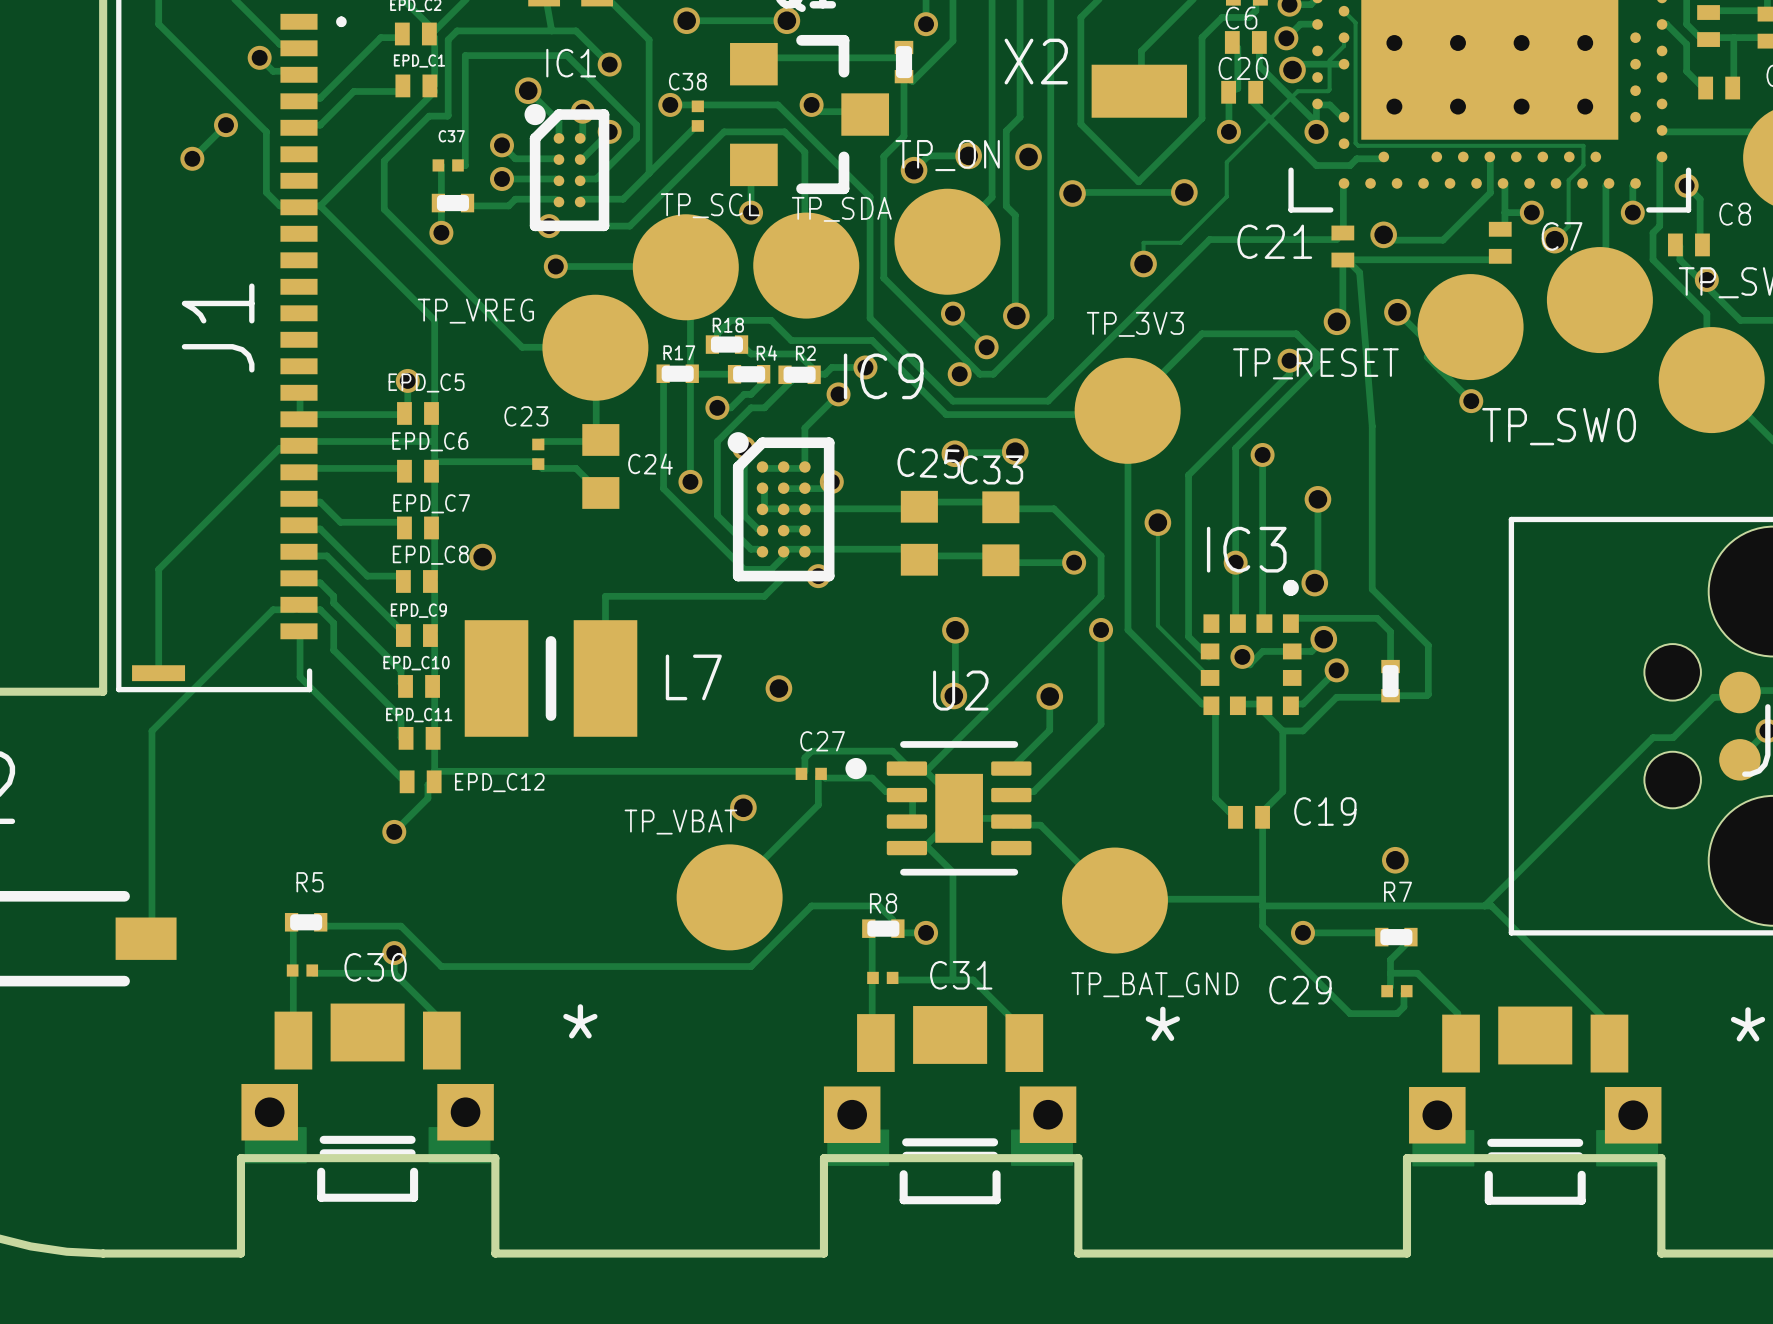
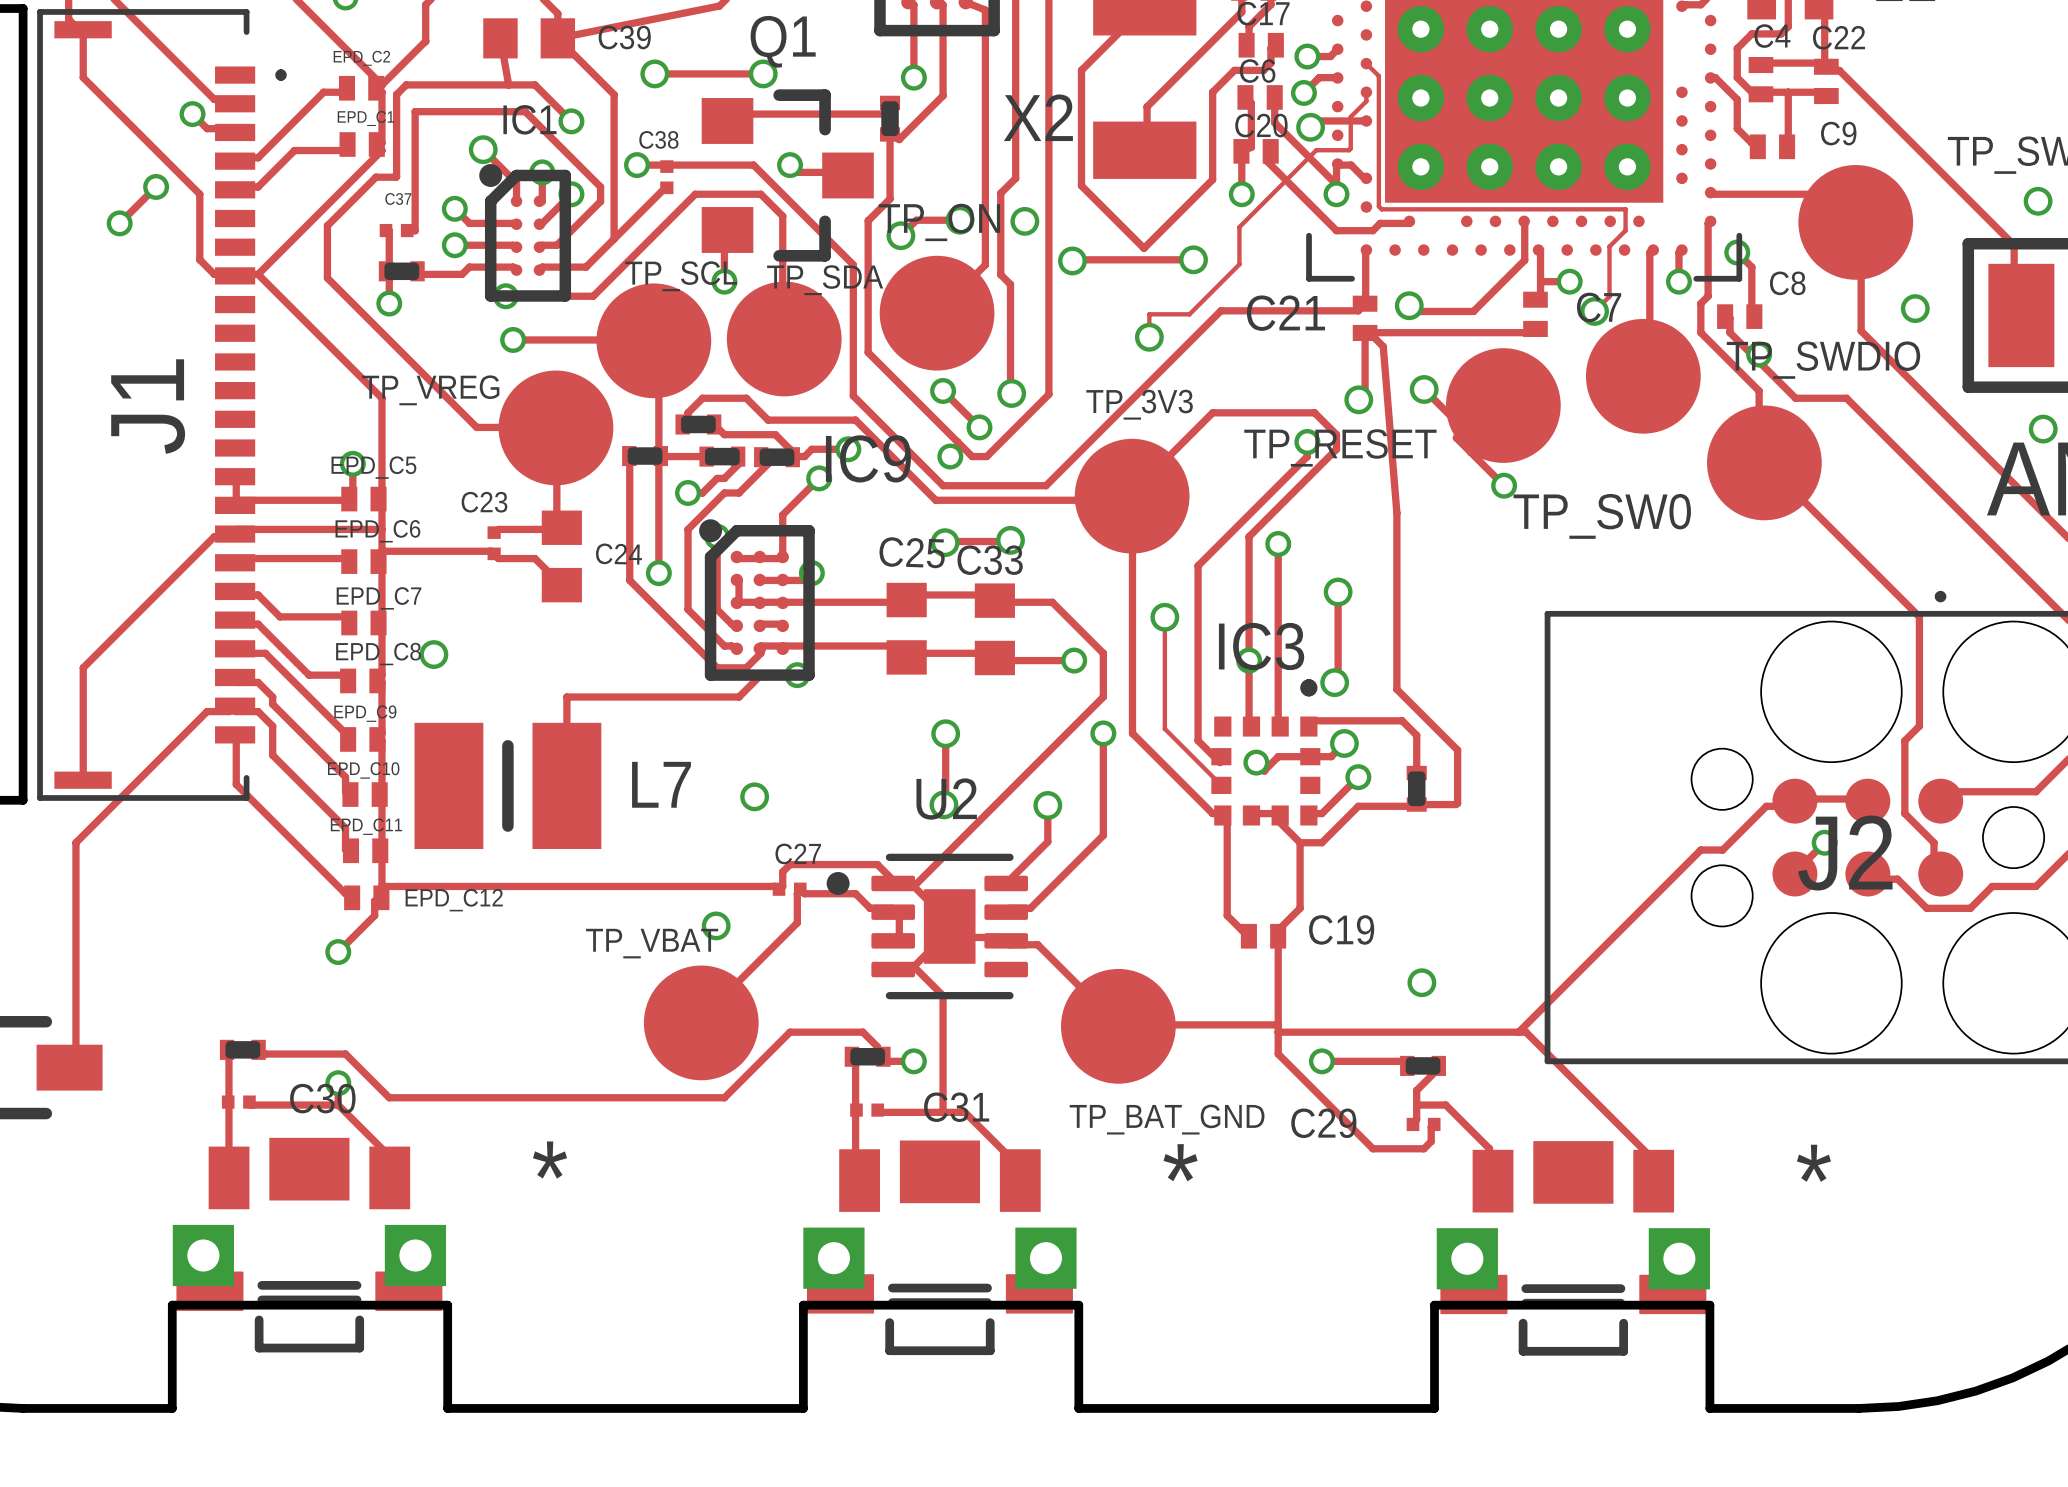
text: R18 (728, 325) -> none
text: R17 (679, 352) -> none
text: R4 (766, 352) -> none
text: R2 (805, 353) -> none
text: R5 (310, 882) -> none
text: R7 (1398, 891) -> none
text: R8 (883, 903) -> none

